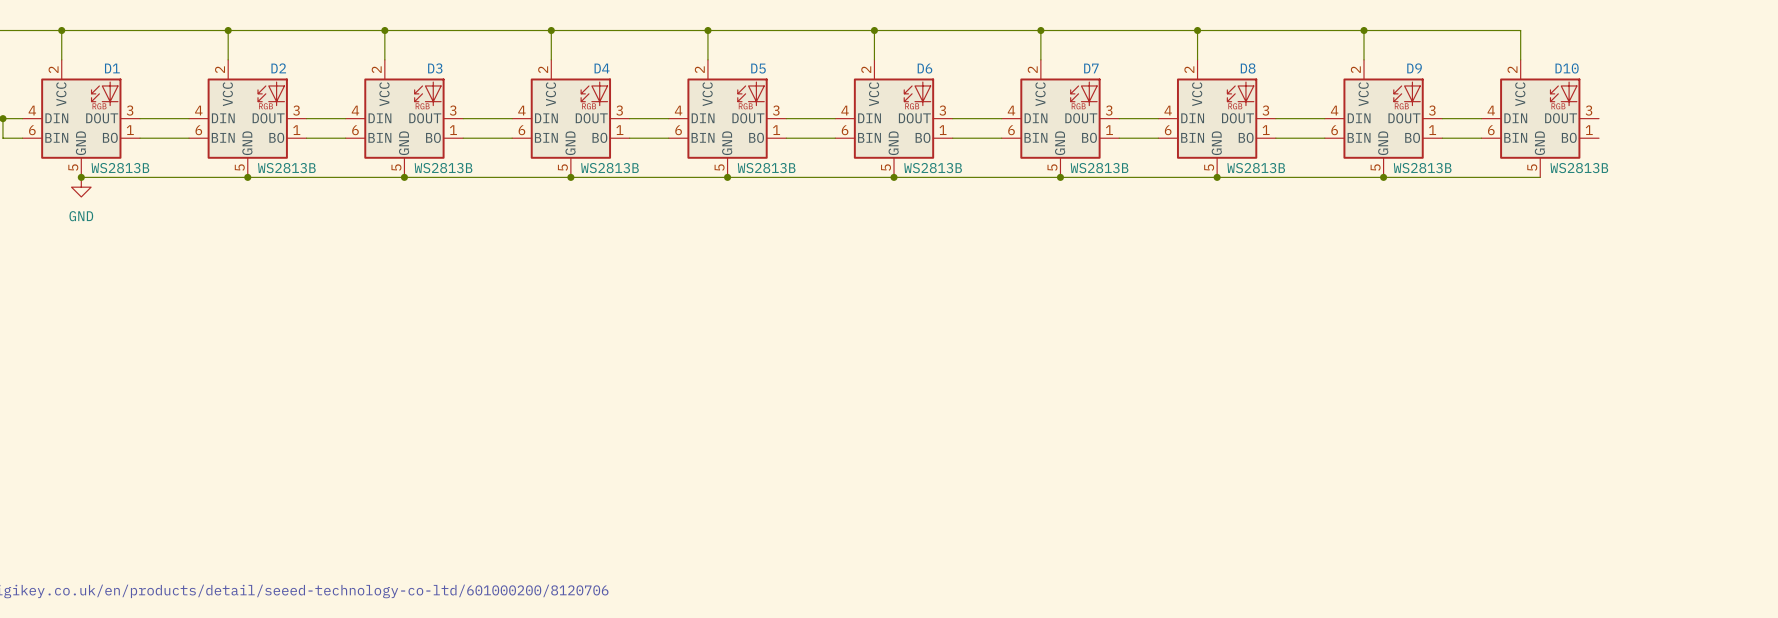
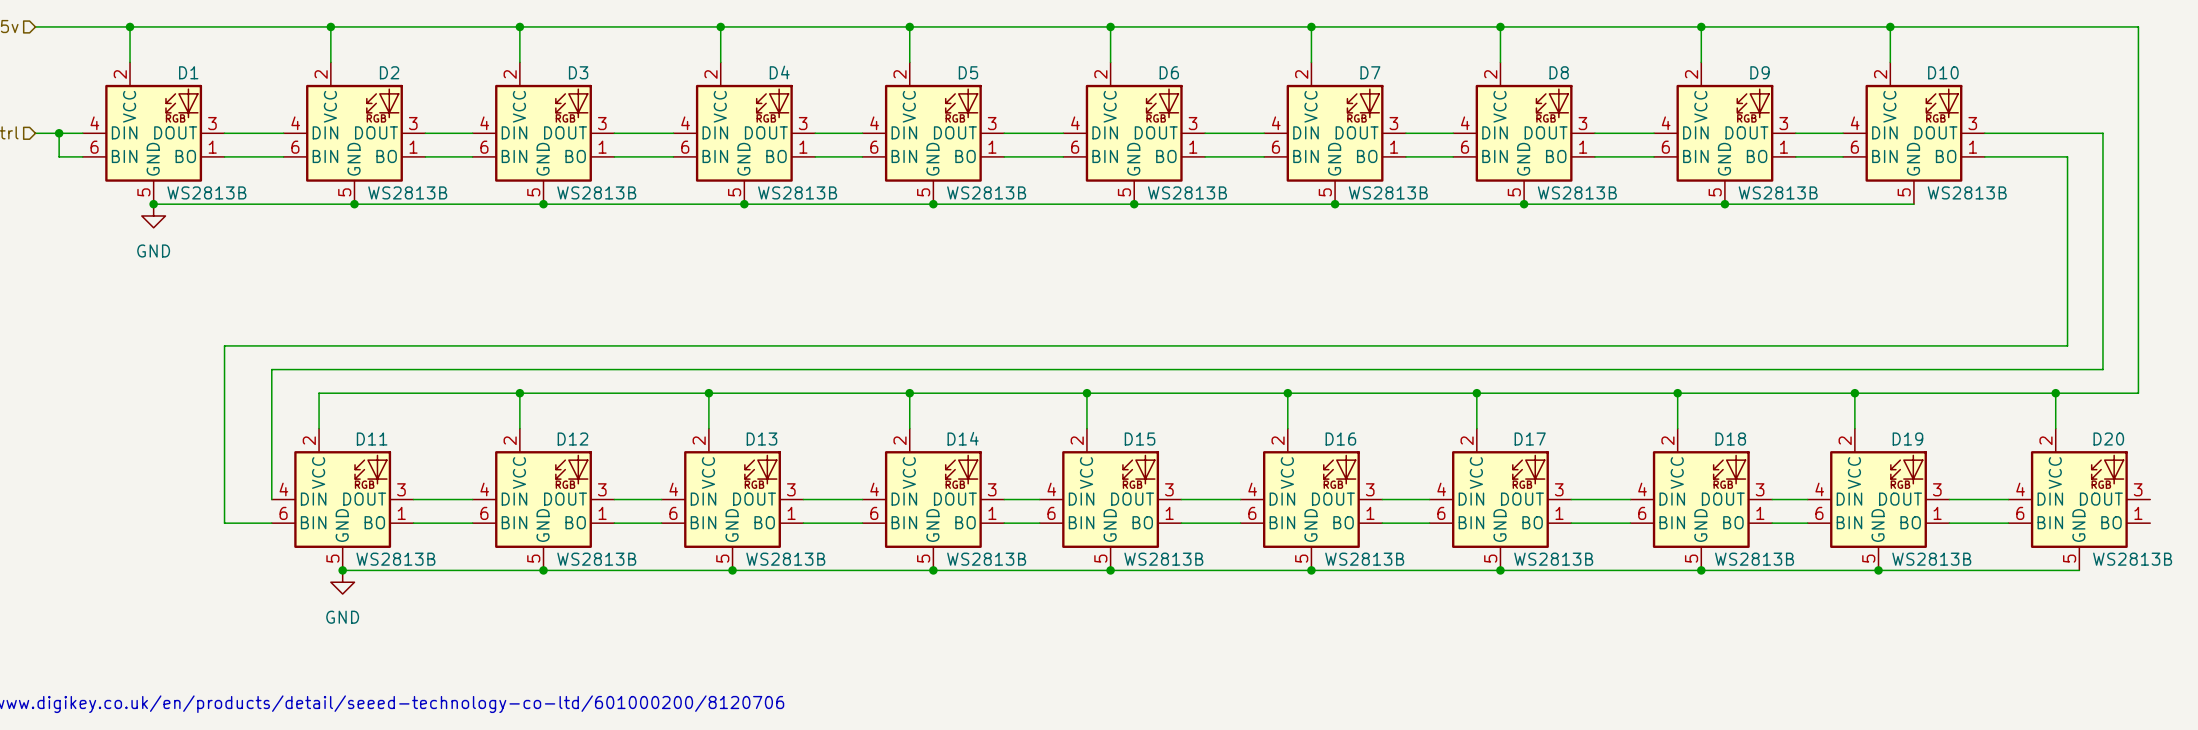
wire: none -> (1890, 26) (2138, 26) (2138, 393) (319, 393) (319, 428)
junction: none -> (1890, 26)
wire: none -> (1984, 133) (2102, 133) (2102, 369) (271, 369) (271, 499)
wire: none -> (1984, 156) (2067, 156) (2067, 345) (224, 345) (224, 523) (271, 523)
wire: none -> (519, 393) (519, 428)
junction: none -> (519, 393)
wire: none -> (708, 393) (708, 428)
junction: none -> (708, 393)
wire: none -> (909, 393) (909, 428)
junction: none -> (909, 393)
wire: none -> (1086, 393) (1086, 428)
junction: none -> (1086, 393)
wire: none -> (1287, 393) (1287, 428)
junction: none -> (1287, 393)
wire: none -> (1476, 393) (1476, 428)
junction: none -> (1476, 393)
wire: none -> (1677, 393) (1677, 428)
junction: none -> (1677, 393)
wire: none -> (1854, 393) (1854, 428)
junction: none -> (1854, 393)
wire: none -> (2055, 393) (2055, 428)
junction: none -> (2055, 393)
D11: none -> WS2813B (342, 499)
wire: none -> (413, 499) (472, 499)
D12: none -> WS2813B (543, 499)
wire: none -> (614, 499) (661, 499)
D13: none -> WS2813B (732, 499)
wire: none -> (803, 499) (862, 499)
D14: none -> WS2813B (933, 499)
wire: none -> (1004, 499) (1039, 499)
D15: none -> WS2813B (1110, 499)
wire: none -> (1181, 499) (1240, 499)
D16: none -> WS2813B (1311, 499)
wire: none -> (1382, 499) (1429, 499)
D17: none -> WS2813B (1500, 499)
wire: none -> (1571, 499) (1630, 499)
D18: none -> WS2813B (1701, 499)
wire: none -> (1772, 499) (1807, 499)
D19: none -> WS2813B (1878, 499)
wire: none -> (1949, 499) (2008, 499)
D20: none -> WS2813B (2079, 499)
wire: none -> (413, 523) (472, 523)
wire: none -> (614, 523) (661, 523)
wire: none -> (803, 523) (862, 523)
wire: none -> (1004, 523) (1039, 523)
wire: none -> (1181, 523) (1240, 523)
wire: none -> (1382, 523) (1429, 523)
wire: none -> (1571, 523) (1630, 523)
wire: none -> (1772, 523) (1807, 523)
wire: none -> (1949, 523) (2008, 523)
wire: none -> (342, 570) (2079, 570)
junction: none -> (342, 570)
junction: none -> (543, 570)
junction: none -> (732, 570)
junction: none -> (933, 570)
junction: none -> (1110, 570)
junction: none -> (1311, 570)
junction: none -> (1500, 570)
junction: none -> (1701, 570)
junction: none -> (1878, 570)
power symbol: none -> GND (342, 582)

